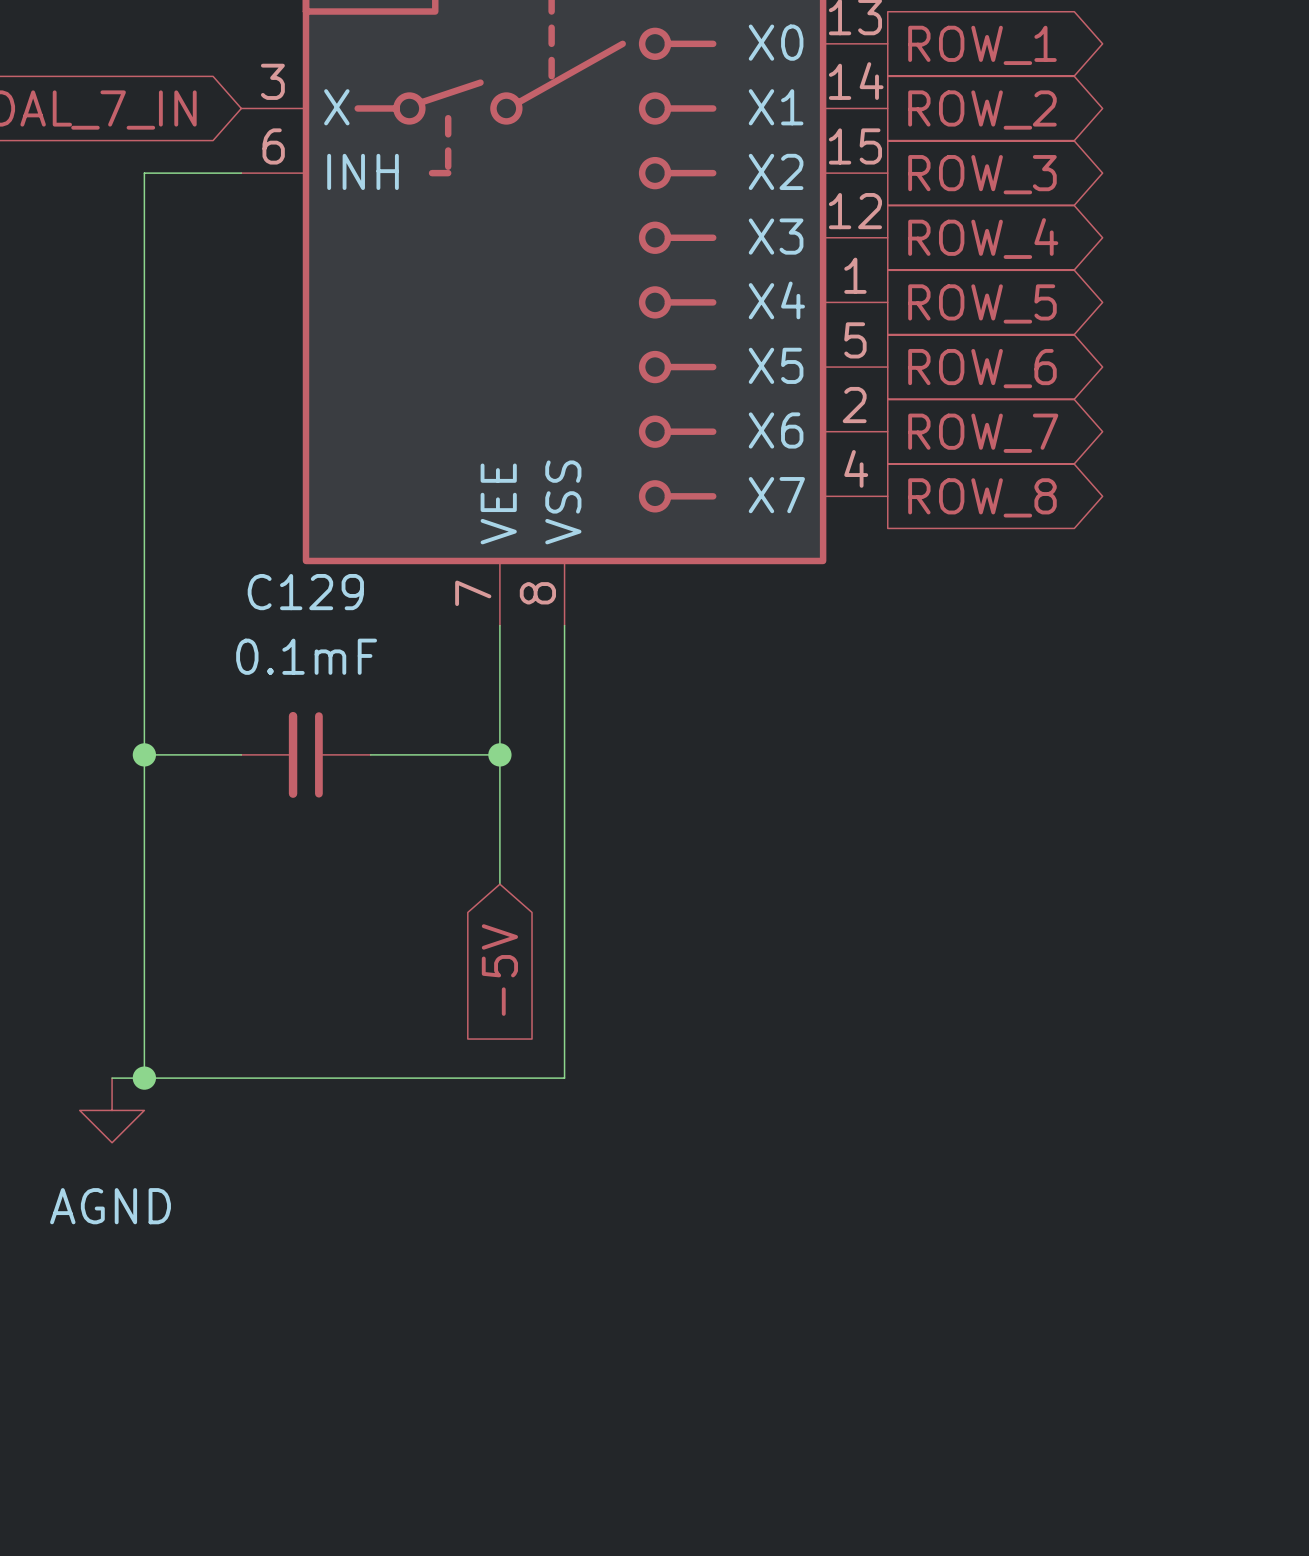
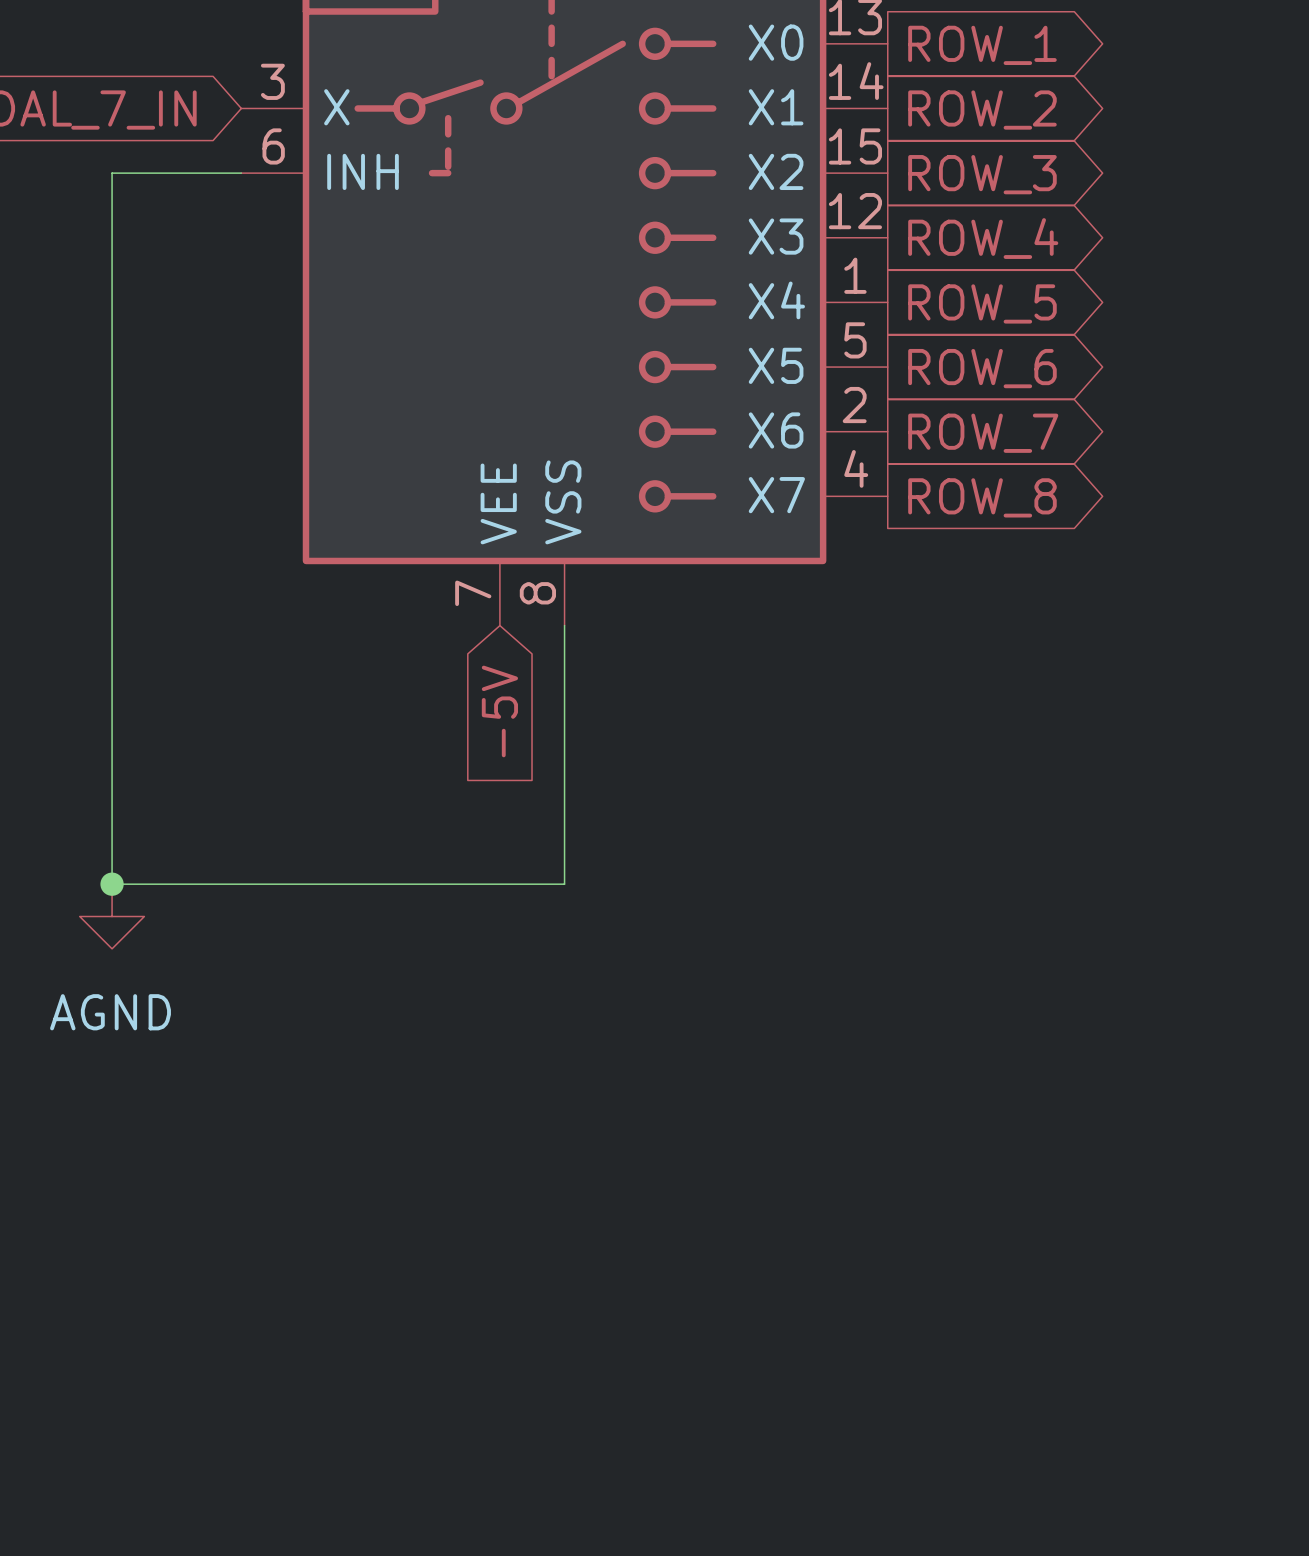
wire: (144, 173) (144, 1078) -> (144, 173) (112, 173) (112, 884) (564, 884)
wire: (499, 625) (499, 884) -> none
wire: (144, 754) (241, 754) -> none
junction: (144, 754) -> none
C129: 0.1mF (305, 754) -> none
wire: (370, 754) (499, 754) -> none
junction: (499, 754) -> none
junction: none -> (112, 884)
wire: (564, 884) (564, 1078) (112, 1078) -> none
global label position: -5V (499, 970) -> -5V (499, 711)
junction: (144, 1078) -> none
power symbol position: AGND (112, 1110) -> AGND (112, 916)

